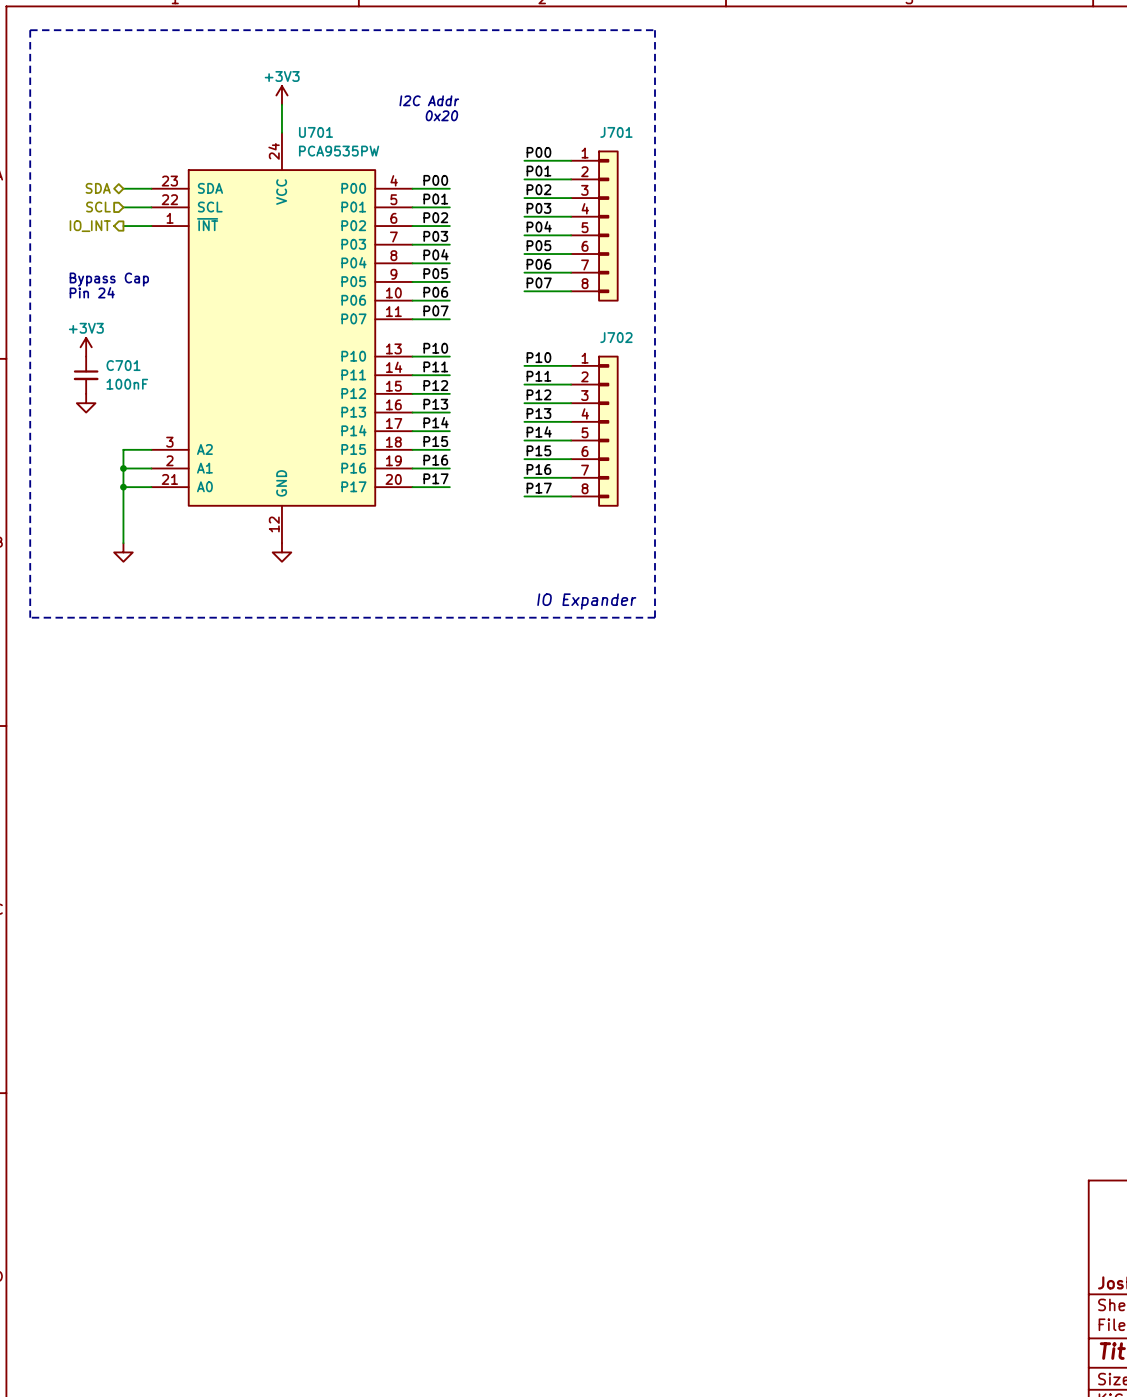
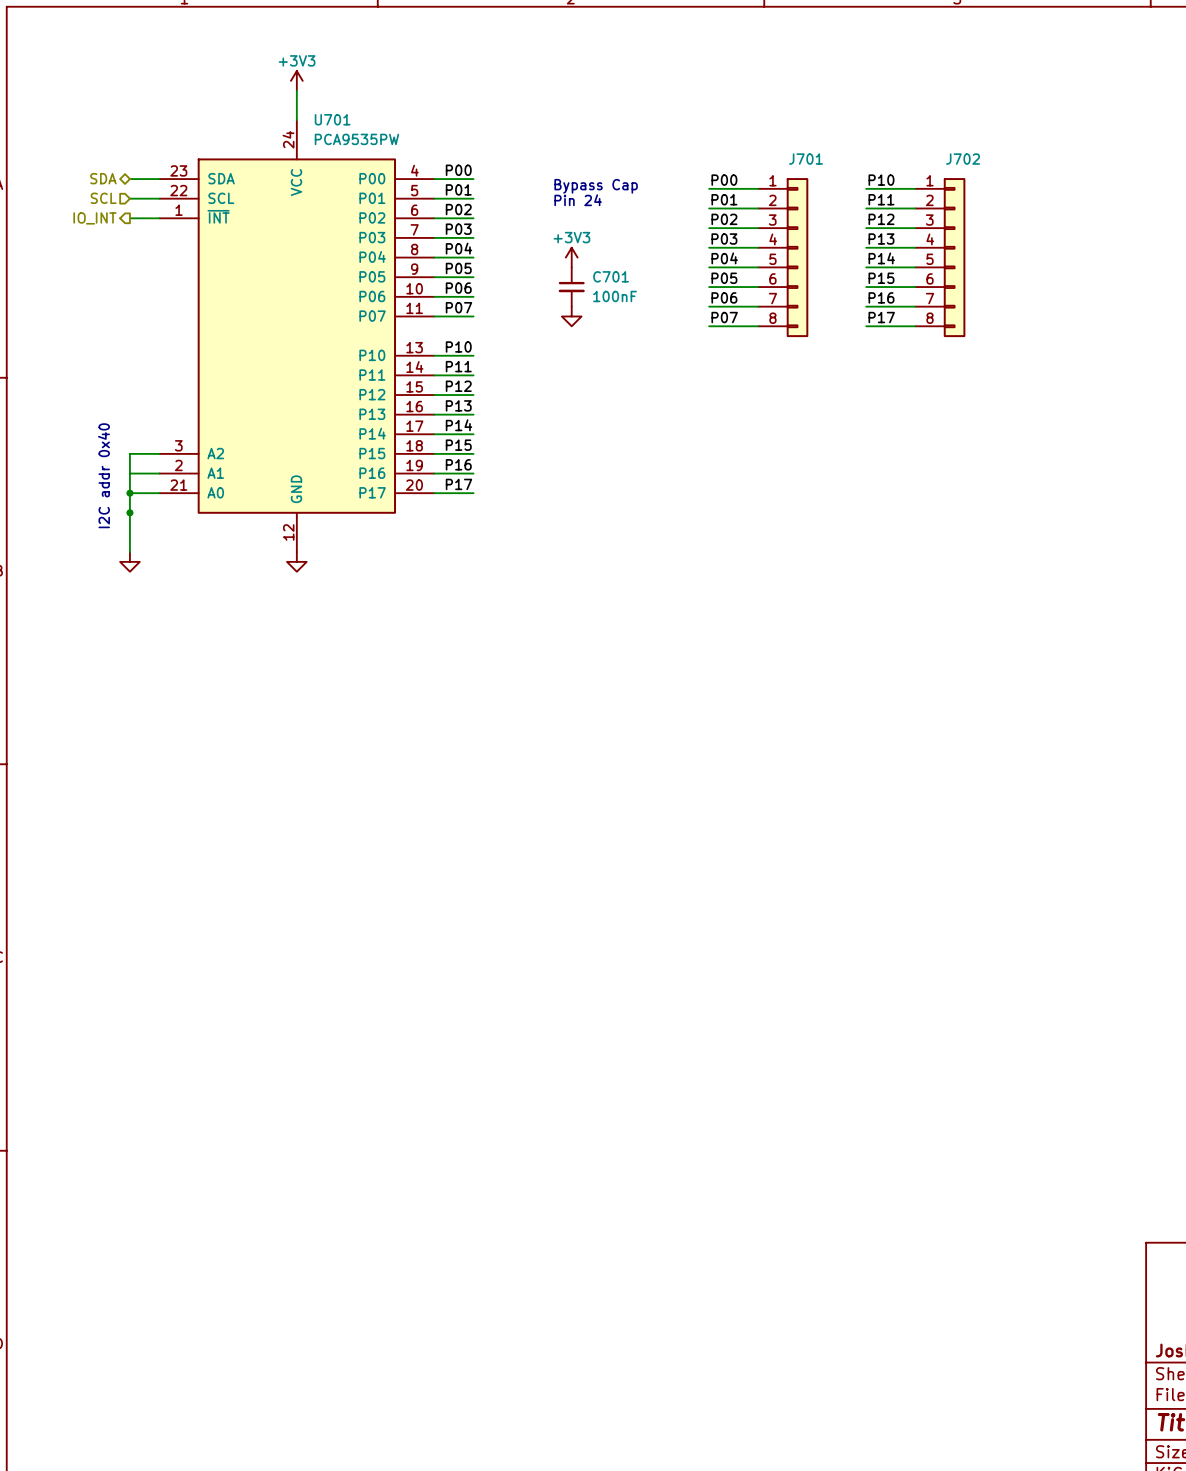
line: (30, 30) (655, 30) (655, 617) (30, 617) (30, 30) -> none
power symbol position: +3V3 (281, 95) -> +3V3 (296, 80)
text: I2C Addr (429, 100) -> none
text: 0x20 (441, 115) -> none
label: P00 (538, 152) -> none
wire: (524, 160) (571, 160) -> (709, 188) (758, 188)
label: none -> P00 (458, 170)
hierarchical label: none -> SDA (103, 178)
label position: P01 (538, 171) -> P01 (724, 199)
label: none -> P00 (724, 180)
label: none -> P10 (881, 180)
text: none -> Bypass Cap (596, 186)
wire: (524, 179) (571, 179) -> (709, 208) (758, 208)
wire: none -> (866, 188) (915, 188)
label: P00 (435, 180) -> P01 (458, 189)
hierarchical label shape: bidirectional (98, 188) -> input (103, 198)
hierarchical label: SDA (98, 188) -> SCL (103, 198)
label position: P02 (538, 189) -> P02 (724, 219)
label: none -> P11 (881, 199)
text: none -> Pin 24 (578, 200)
wire: (524, 198) (571, 198) -> (709, 228) (758, 228)
wire: none -> (866, 208) (915, 208)
label: P01 (435, 199) -> P02 (458, 209)
hierarchical label shape: input (98, 207) -> output (94, 218)
hierarchical label: SCL (98, 207) -> IO_INT (94, 218)
label position: P03 (538, 208) -> P03 (724, 239)
label: none -> P12 (881, 219)
wire: (524, 216) (571, 216) -> (709, 247) (758, 247)
wire: none -> (866, 228) (915, 228)
label: P02 (435, 217) -> P03 (458, 229)
hierarchical label: IO_INT (90, 226) -> none
wire: (123, 226) (151, 226) -> (129, 179) (159, 179)
label position: P04 (539, 226) -> P04 (724, 258)
J701 position: (594, 226) -> (783, 257)
label: none -> P13 (881, 239)
wire: (524, 235) (571, 235) -> (709, 267) (758, 267)
wire: none -> (866, 247) (915, 247)
label: P03 (435, 236) -> P04 (458, 248)
power symbol: none -> +3V3 (571, 257)
label position: P05 (538, 245) -> P05 (724, 278)
label: none -> P14 (881, 258)
label: P04 (436, 254) -> P05 (458, 268)
wire: (524, 254) (571, 254) -> (709, 287) (758, 287)
wire: none -> (866, 267) (915, 267)
label position: P06 (538, 264) -> P06 (724, 297)
label: none -> P15 (881, 278)
wire: (524, 272) (571, 272) -> (709, 306) (758, 306)
wire: none -> (866, 287) (915, 287)
label: P05 (435, 273) -> P06 (458, 288)
text: Bypass Cap (109, 279) -> none
label: P07 (539, 282) -> none
label: none -> P16 (881, 297)
wire: (524, 291) (571, 291) -> (709, 326) (758, 326)
wire: none -> (866, 306) (915, 306)
text: Pin 24 (92, 292) -> none
label: P06 (435, 292) -> P07 (458, 307)
power symbol: none -> (571, 316)
label: none -> P07 (724, 317)
label: none -> P17 (881, 317)
wire: none -> (866, 326) (915, 326)
label: P07 (436, 310) -> none
wire: (412, 319) (449, 319) -> (434, 179) (473, 179)
U701 position: (281, 337) -> (296, 336)
power symbol: +3V3 (86, 347) -> none
label: P10 (435, 348) -> P11 (458, 366)
label position: P10 (538, 357) -> P10 (458, 346)
wire: (524, 365) (571, 365) -> none
label: P11 (435, 366) -> P12 (458, 386)
C701 position: (86, 375) -> (571, 287)
label: P11 (538, 376) -> none
wire: (524, 384) (571, 384) -> none
label: P12 (435, 385) -> P13 (458, 405)
label: P12 (538, 394) -> none
power symbol: (86, 403) -> none
wire: (524, 403) (571, 403) -> none
label: P13 (435, 404) -> P14 (458, 425)
label: P13 (538, 413) -> none
wire: (524, 421) (571, 421) -> none
label: P14 (436, 422) -> P15 (458, 445)
wire: none -> (159, 453) (129, 453) (129, 473)
label: P14 (539, 431) -> none
J702 position: (594, 431) -> (940, 257)
wire: (524, 440) (571, 440) -> none
label: P15 (435, 441) -> P16 (458, 464)
label: P15 (538, 450) -> none
text: none -> I2C addr 0x40 (103, 475)
wire: (524, 459) (571, 459) -> none
label: P16 (435, 460) -> P17 (458, 484)
label: P16 (538, 469) -> none
wire: (524, 477) (571, 477) -> none
label: P17 (436, 478) -> none
wire: (123, 487) (151, 487) -> none
wire: (412, 487) (449, 487) -> (434, 355) (473, 355)
label: P17 (539, 488) -> none
wire: (524, 496) (571, 496) -> none
power symbol position: (123, 552) -> (129, 561)
power symbol position: (281, 552) -> (296, 561)
text: IO Expander (586, 601) -> none

